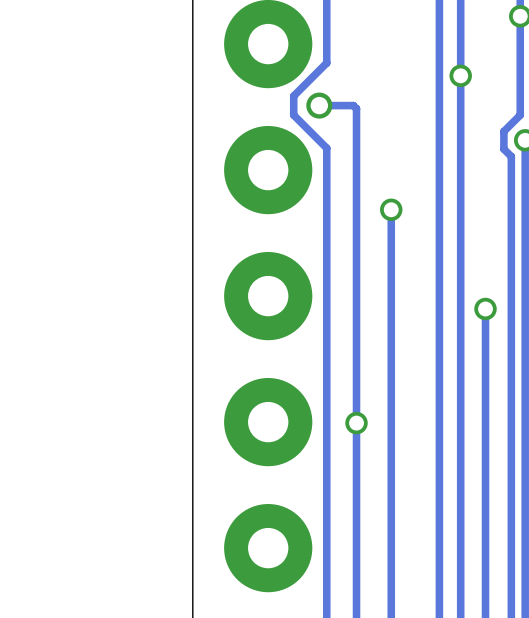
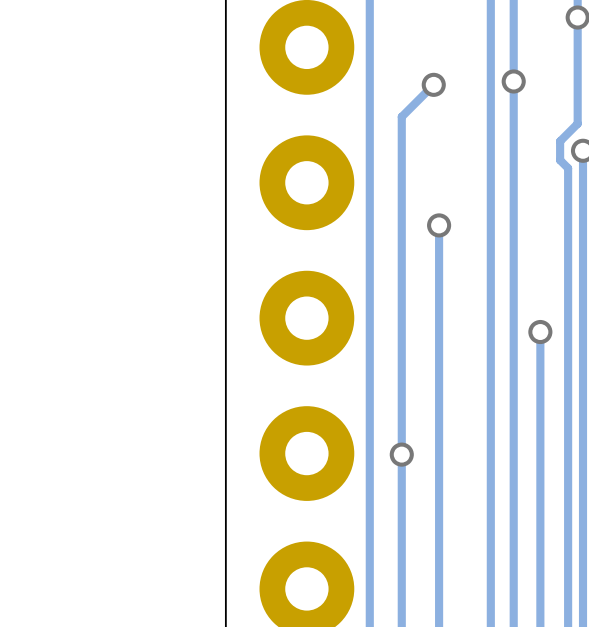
track: (326, 62) (293, 96) (293, 115) (326, 148) -> (369, 67) (369, 159)
via: none -> (433, 84)
track: (319, 105) (353, 105) (356, 108) -> (433, 84) (401, 116)
via: (319, 105) -> none

